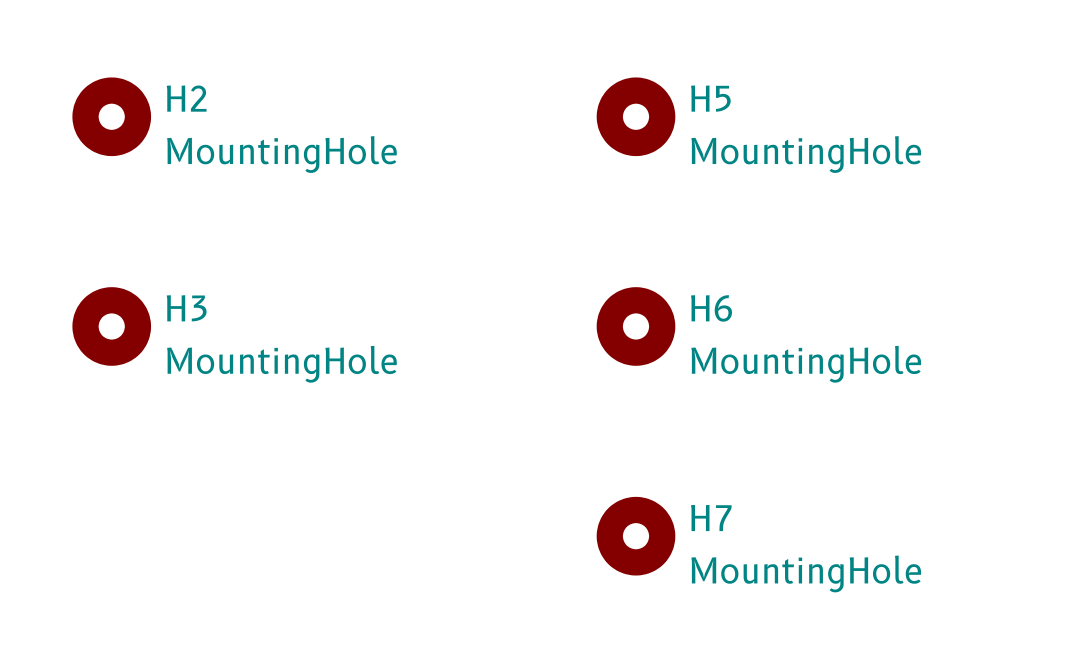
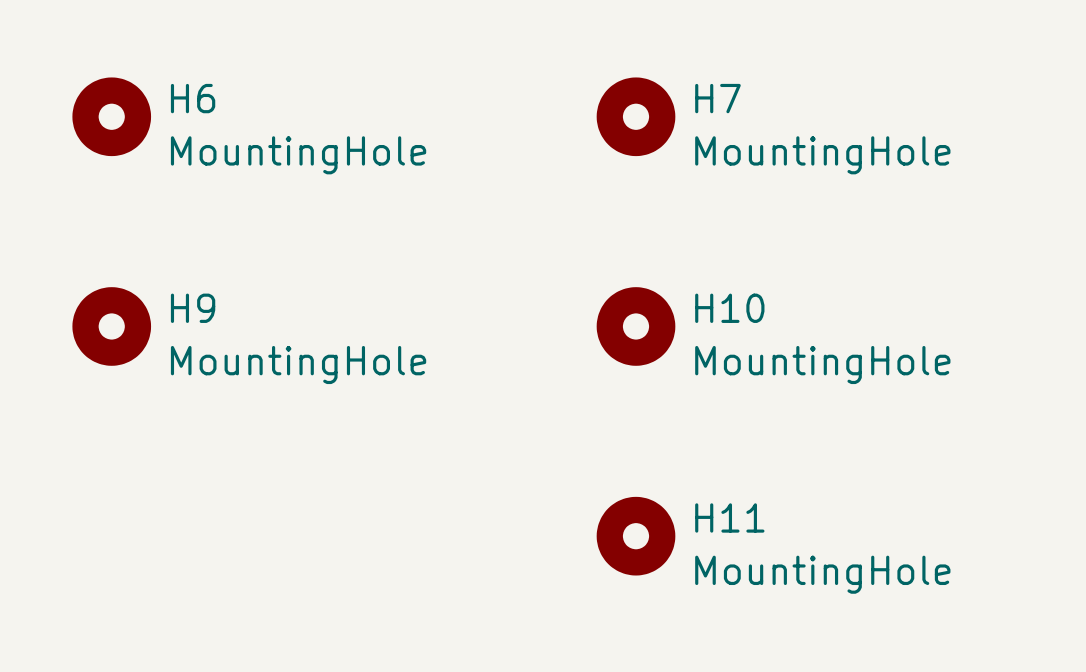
H2 name: H2 (186, 98) -> H6 (193, 98)
H5 name: H5 (710, 98) -> H7 (717, 98)
H3 name: H3 (186, 308) -> H9 (193, 308)
H6 name: H6 (711, 308) -> H10 (729, 308)
H7 name: H7 (711, 517) -> H11 (729, 517)

